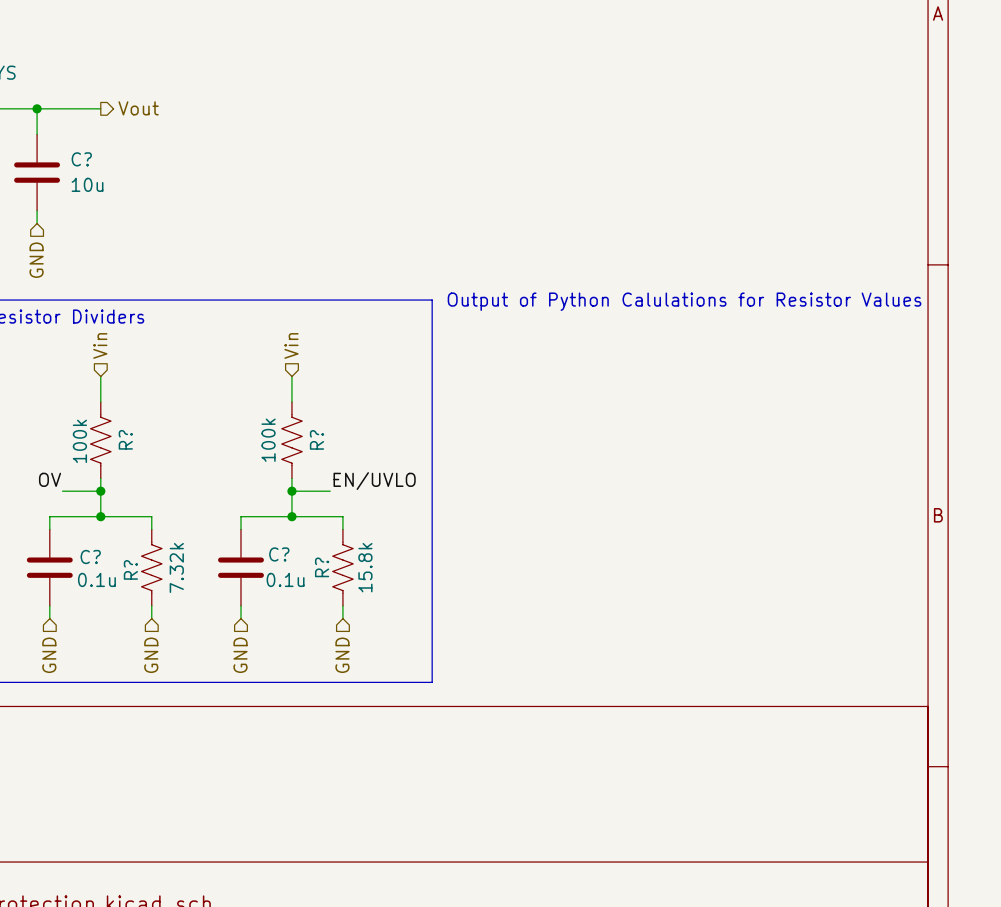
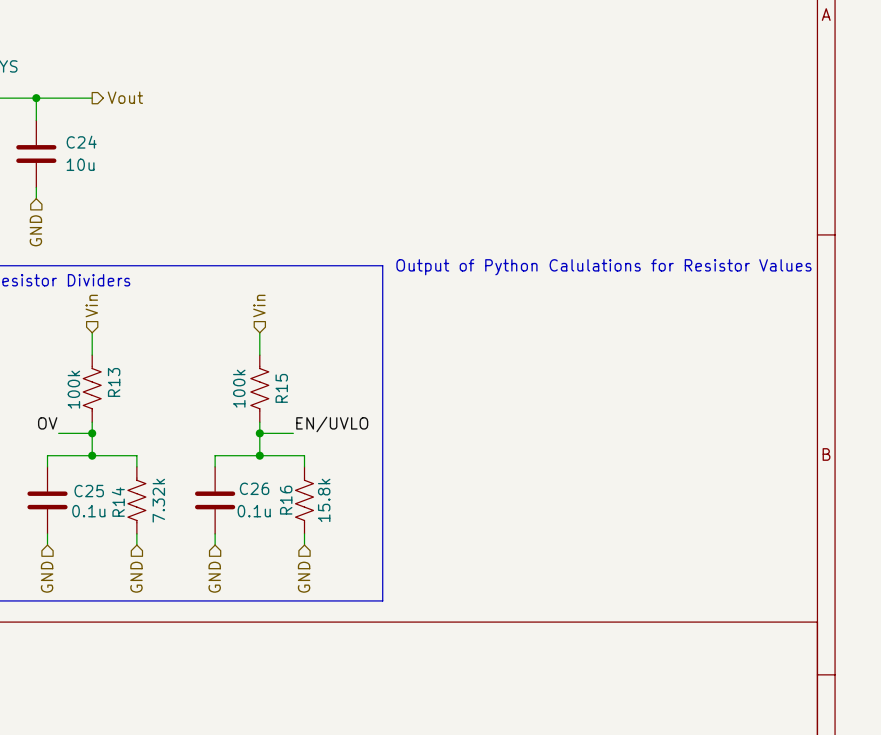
C? name: C? (81, 159) -> C24 (81, 142)
R? name: R? (125, 439) -> R13 (114, 382)
R? name: R? (316, 439) -> R15 (281, 388)
C? name: C? (279, 554) -> C26 (254, 488)
C? name: C? (90, 557) -> C25 (89, 491)
R? name: R? (322, 567) -> R16 (286, 500)
R? name: R? (130, 569) -> R14 (118, 502)

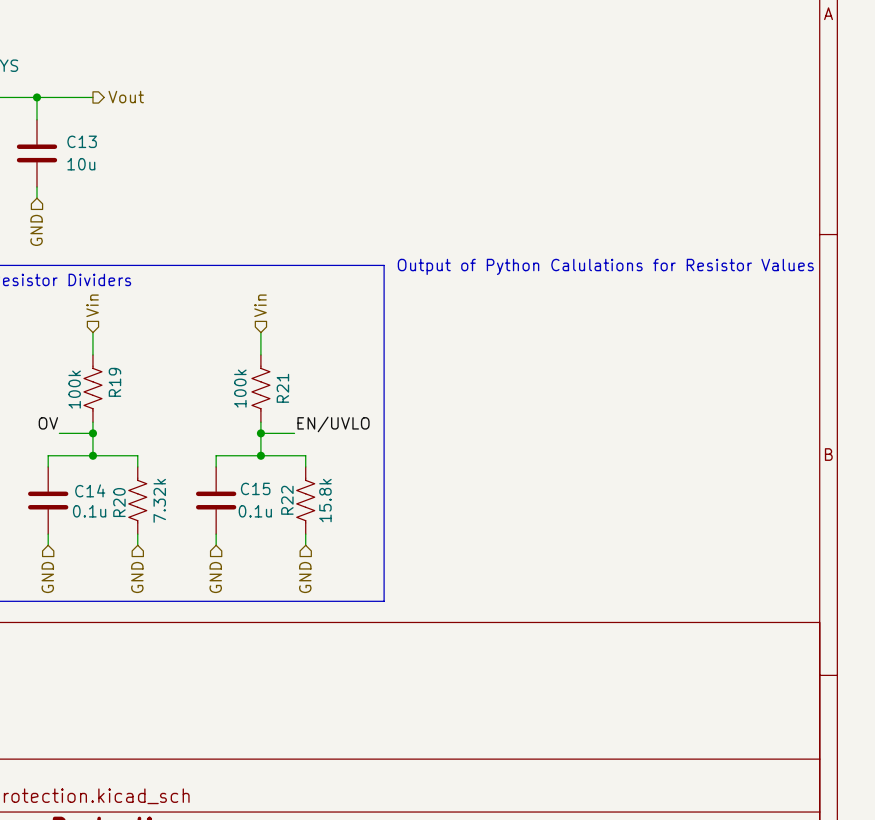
C24 name: C24 (81, 142) -> C13 (82, 141)
R13 name: R13 (114, 382) -> R19 (114, 382)
R15 name: R15 (281, 388) -> R21 (282, 388)
C26 name: C26 (254, 488) -> C15 (255, 488)
C25 name: C25 (89, 491) -> C14 (90, 490)
R16 name: R16 (286, 500) -> R22 (287, 500)
R14 name: R14 (118, 502) -> R20 (119, 502)

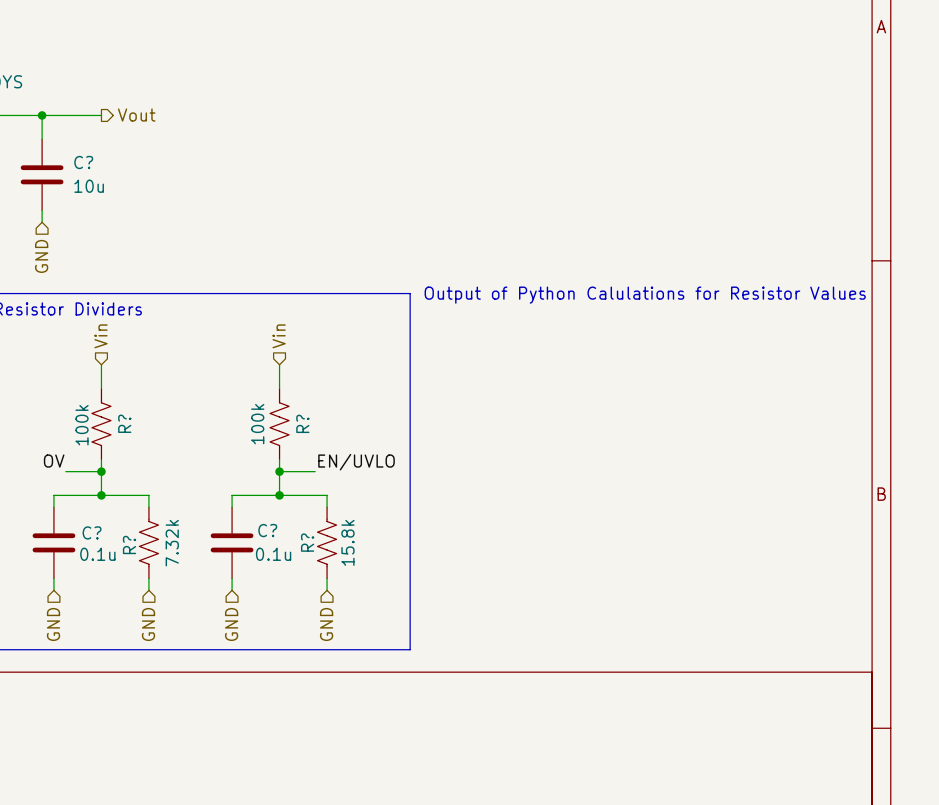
C13 name: C13 (82, 141) -> C? (83, 162)
R19 name: R19 (114, 382) -> R? (124, 423)
R21 name: R21 (282, 388) -> R? (302, 423)
C15 name: C15 (255, 488) -> C? (267, 530)
C14 name: C14 (90, 490) -> C? (92, 532)
R22 name: R22 (287, 500) -> R? (307, 542)
R20 name: R20 (119, 502) -> R? (129, 544)

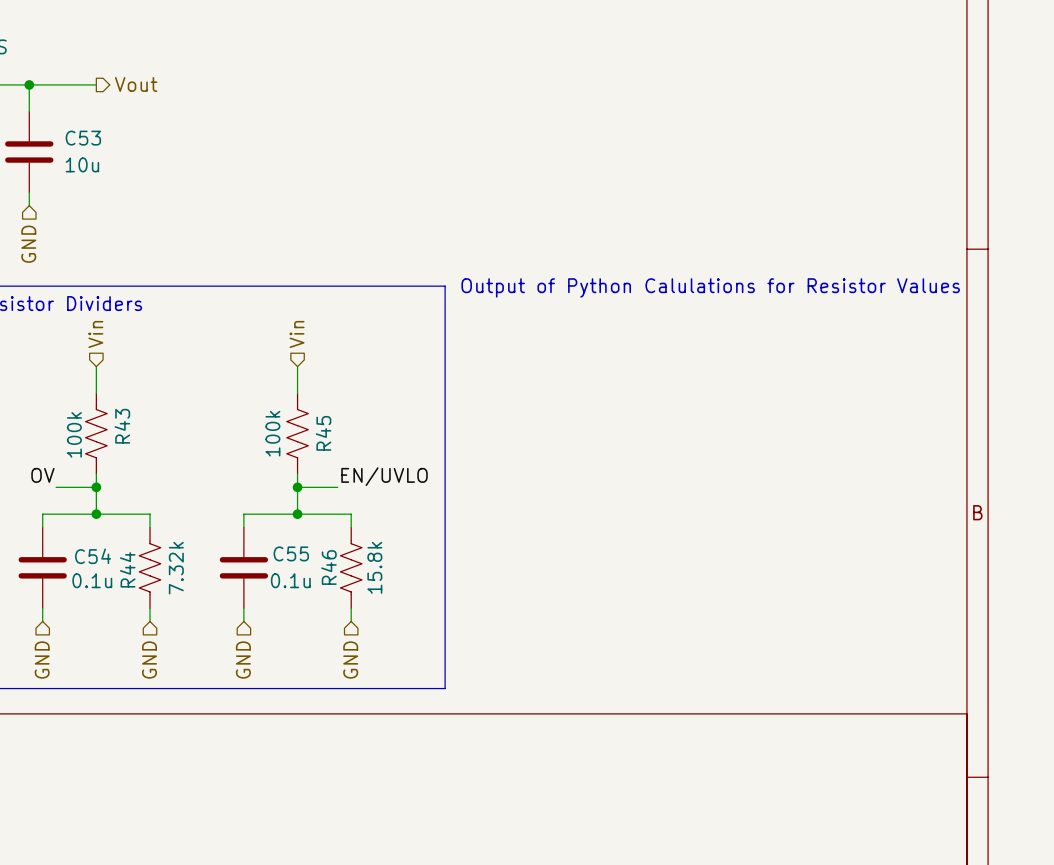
C? name: C? (83, 162) -> C53 (83, 138)
R? name: R? (124, 423) -> R43 (122, 426)
R? name: R? (302, 423) -> R45 (323, 433)
C? name: C? (267, 530) -> C55 (291, 553)
C? name: C? (92, 532) -> C54 (93, 556)
R? name: R? (307, 542) -> R46 (328, 567)
R? name: R? (129, 544) -> R44 (127, 569)

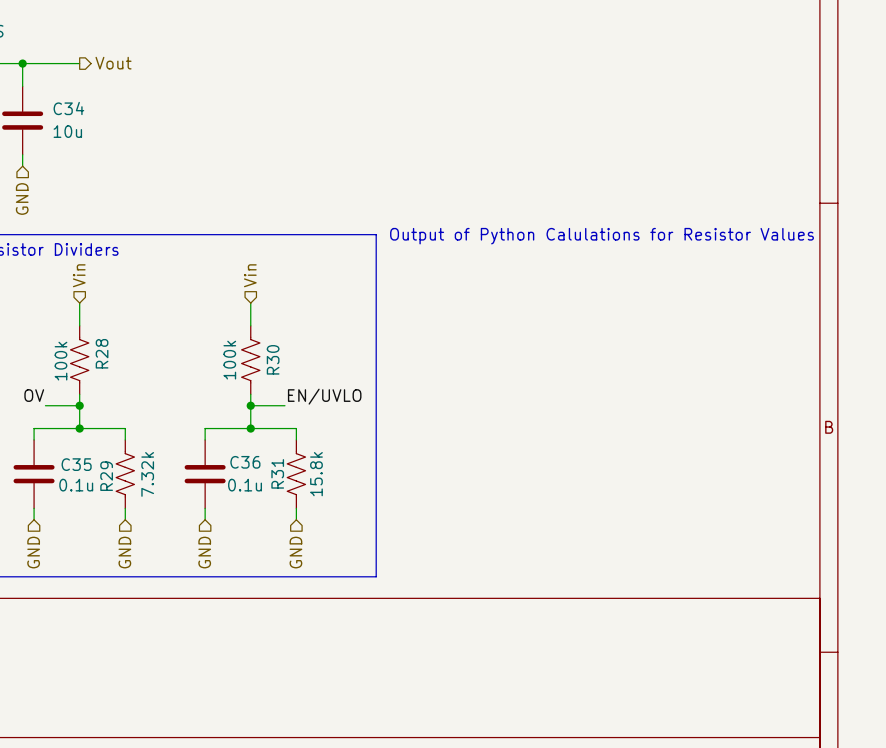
C53 name: C53 (83, 138) -> C34 (68, 108)
R43 name: R43 (122, 426) -> R28 (102, 353)
R45 name: R45 (323, 433) -> R30 (273, 359)
C55 name: C55 (291, 553) -> C36 (245, 462)
C54 name: C54 (93, 556) -> C35 (76, 464)
R46 name: R46 (328, 567) -> R31 (277, 473)
R44 name: R44 (127, 569) -> R29 (106, 476)

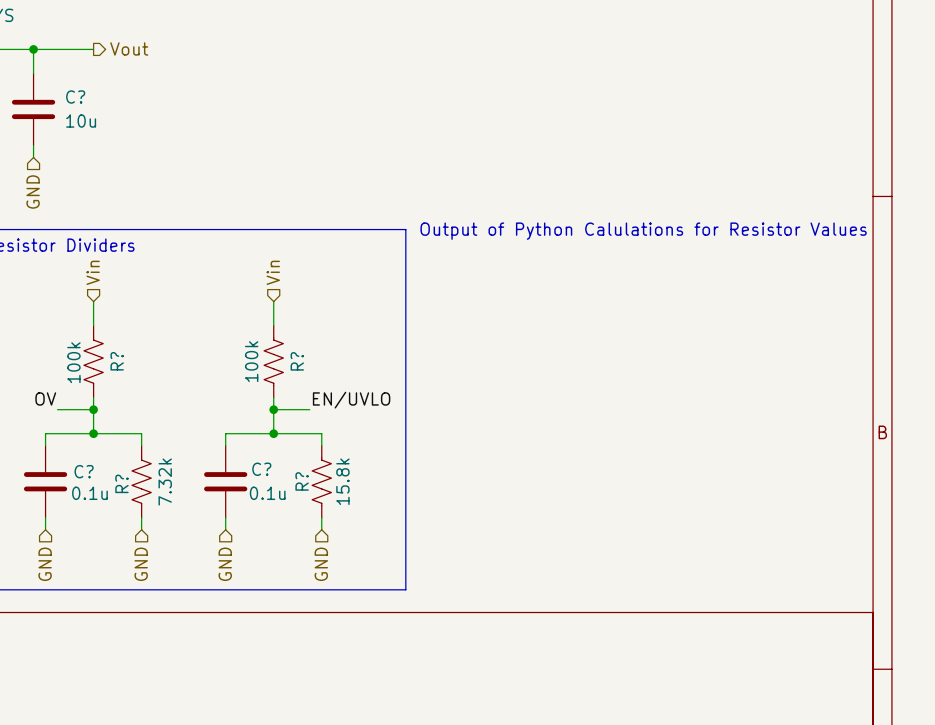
C34 name: C34 (68, 108) -> C? (75, 97)
R28 name: R28 (102, 353) -> R? (117, 361)
R30 name: R30 (273, 359) -> R? (297, 361)
C36 name: C36 (245, 462) -> C? (261, 469)
C35 name: C35 (76, 464) -> C? (84, 471)
R31 name: R31 (277, 473) -> R? (302, 481)
R29 name: R29 (106, 476) -> R? (121, 483)

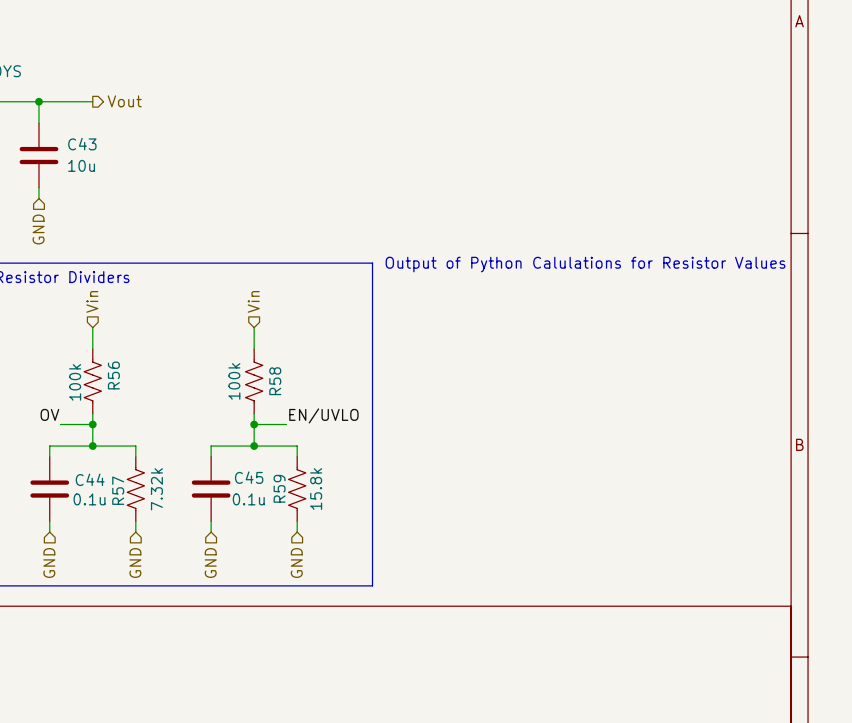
C? name: C? (75, 97) -> C43 (82, 144)
R? name: R? (117, 361) -> R56 (113, 375)
R? name: R? (297, 361) -> R58 (275, 381)
C? name: C? (261, 469) -> C45 (249, 477)
C? name: C? (84, 471) -> C44 (90, 479)
R? name: R? (302, 481) -> R59 (279, 488)
R? name: R? (121, 483) -> R57 (118, 490)

